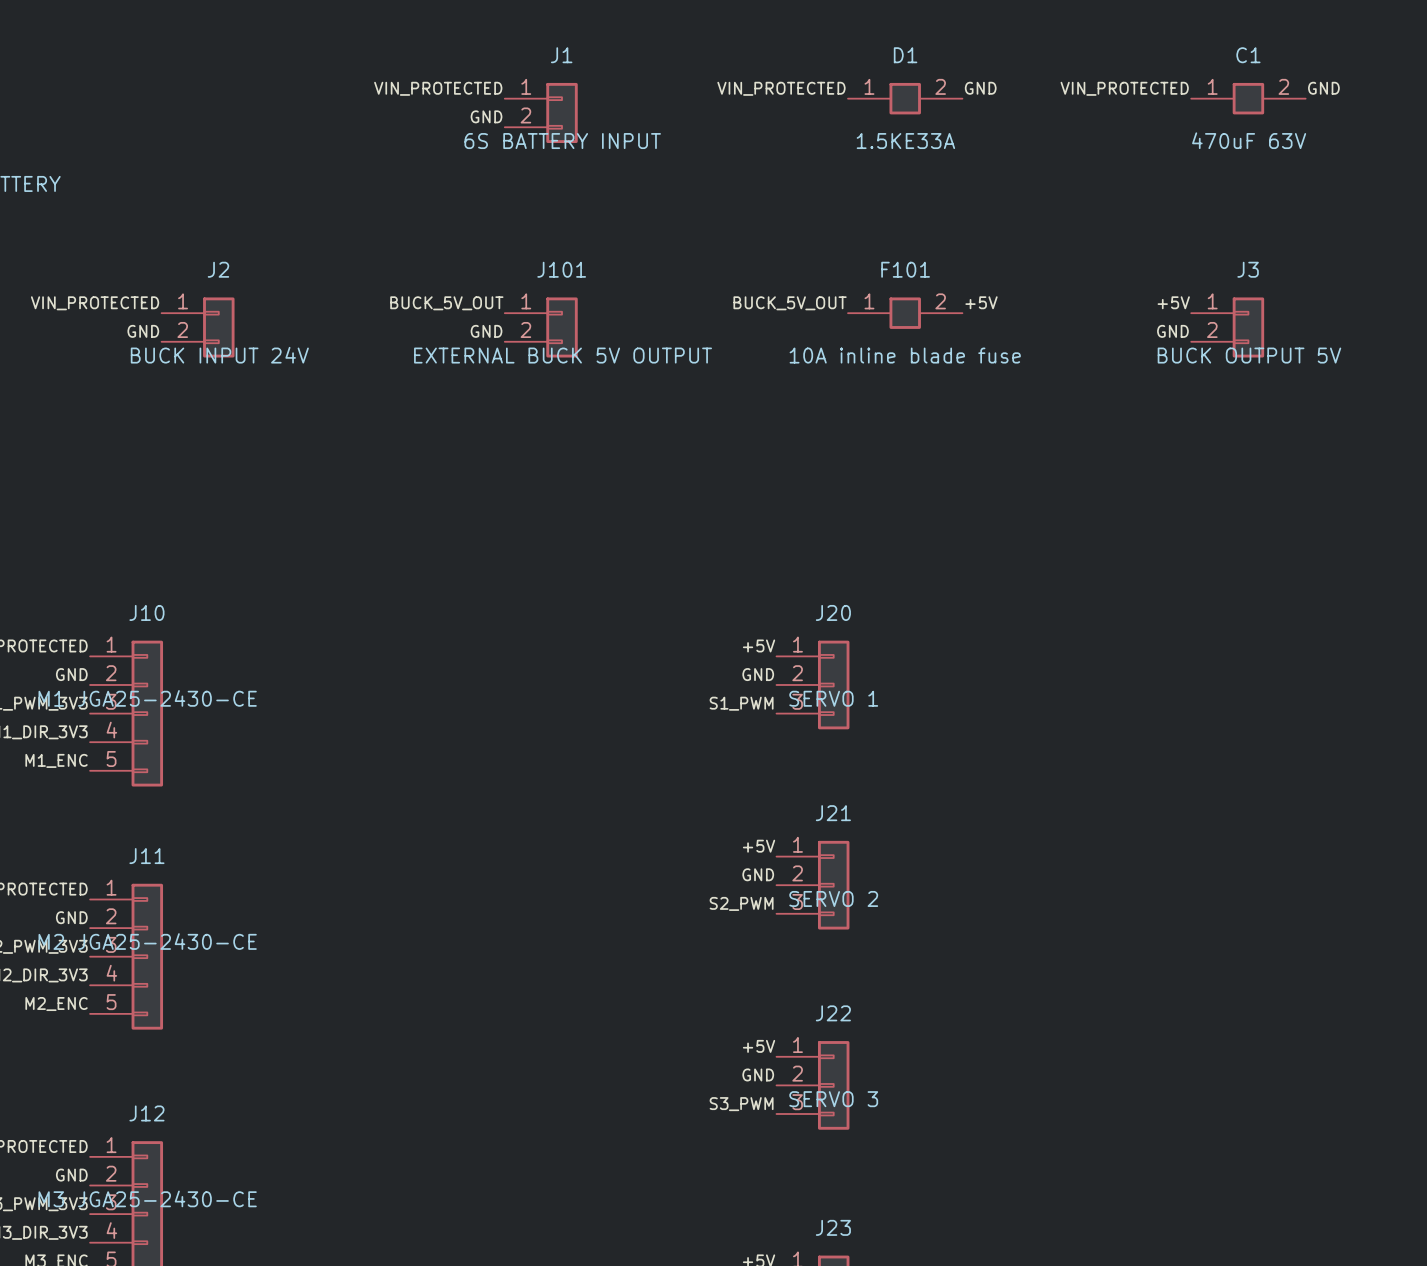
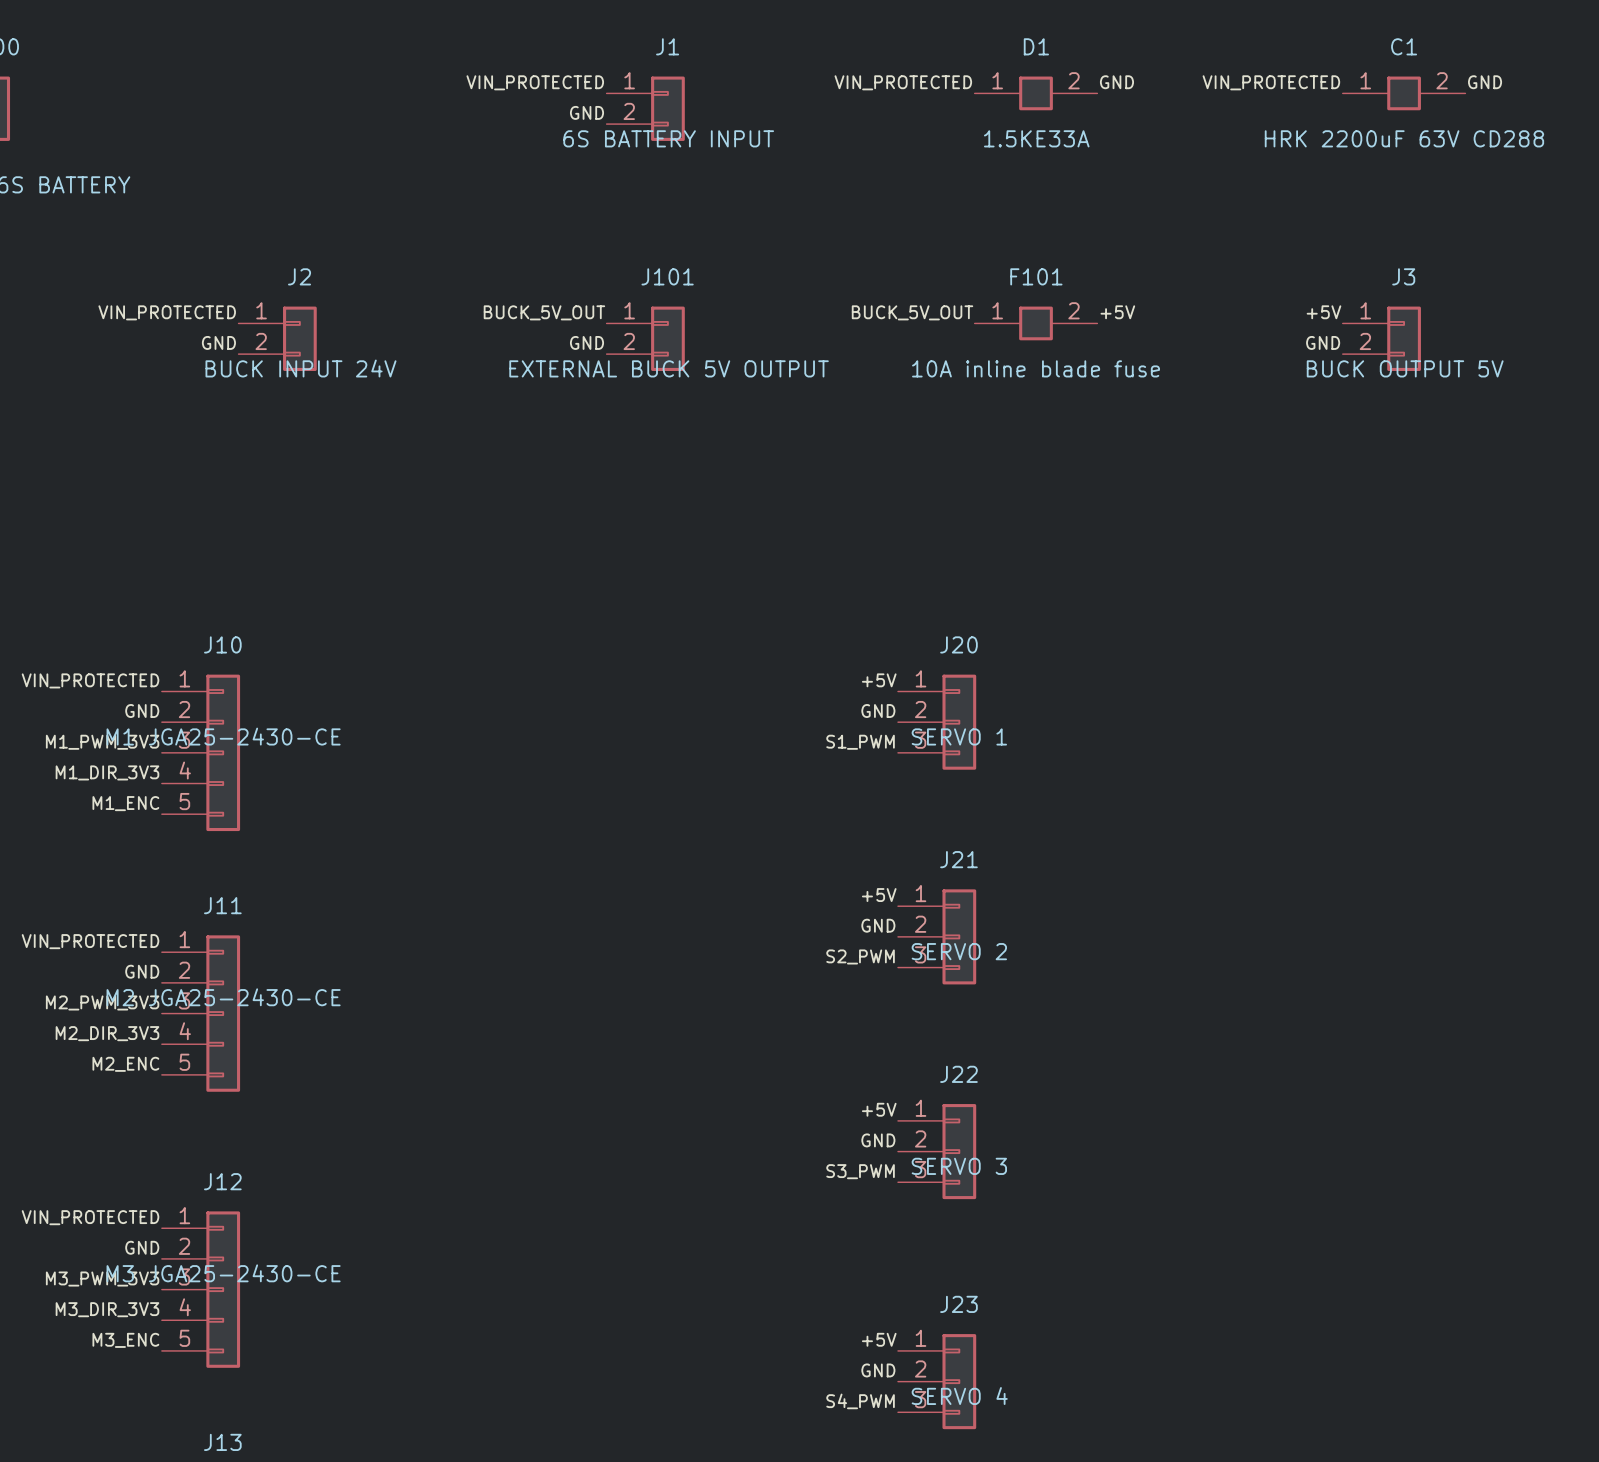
C1 value: 470uF 63V (1249, 140) -> HRK 2200uF 63V CD288 (1404, 138)

